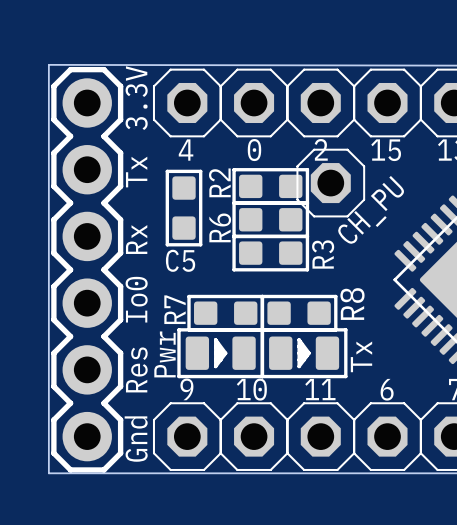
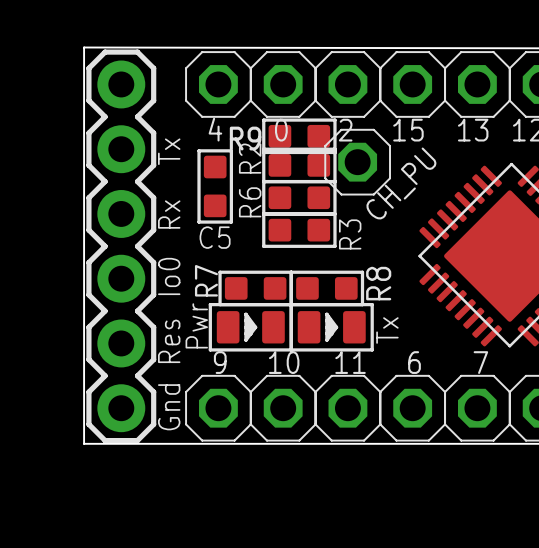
text: 3.3V (136, 98) -> none
R9: none -> (299, 136)

